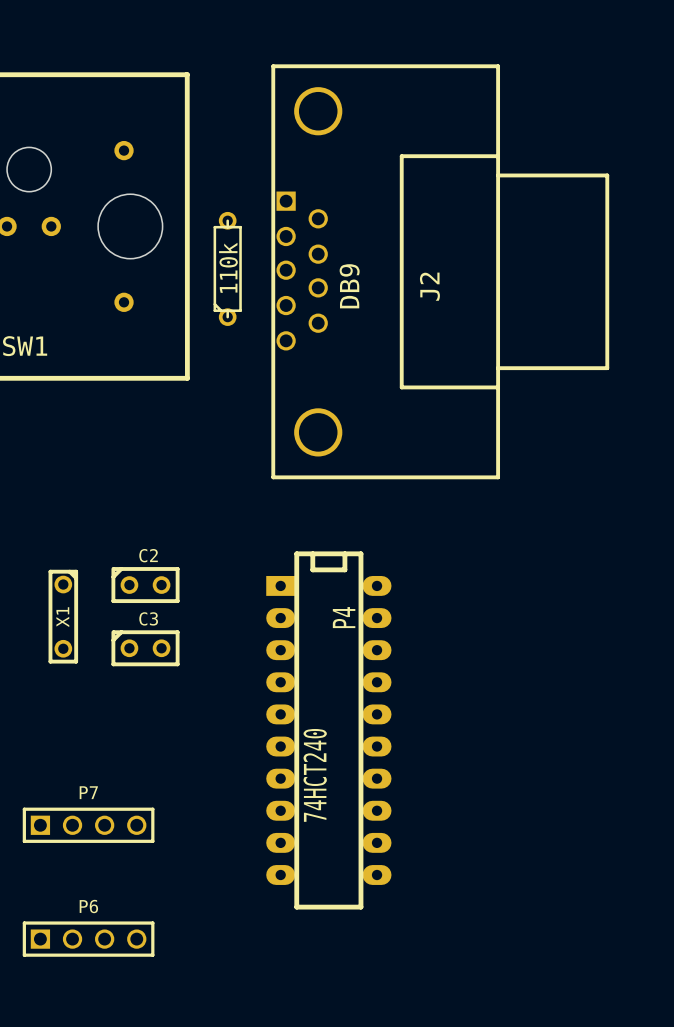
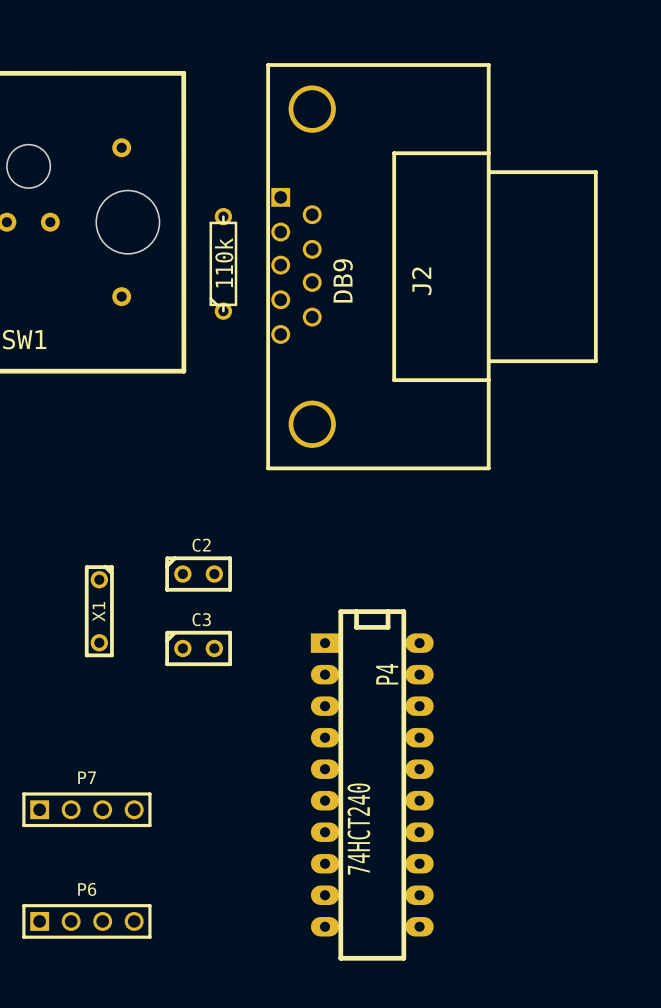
C2 position: (145, 585) -> (198, 574)
X1 position: (63, 616) -> (99, 611)
C3 position: (145, 648) -> (198, 648)
P4 position: (328, 730) -> (372, 784)

